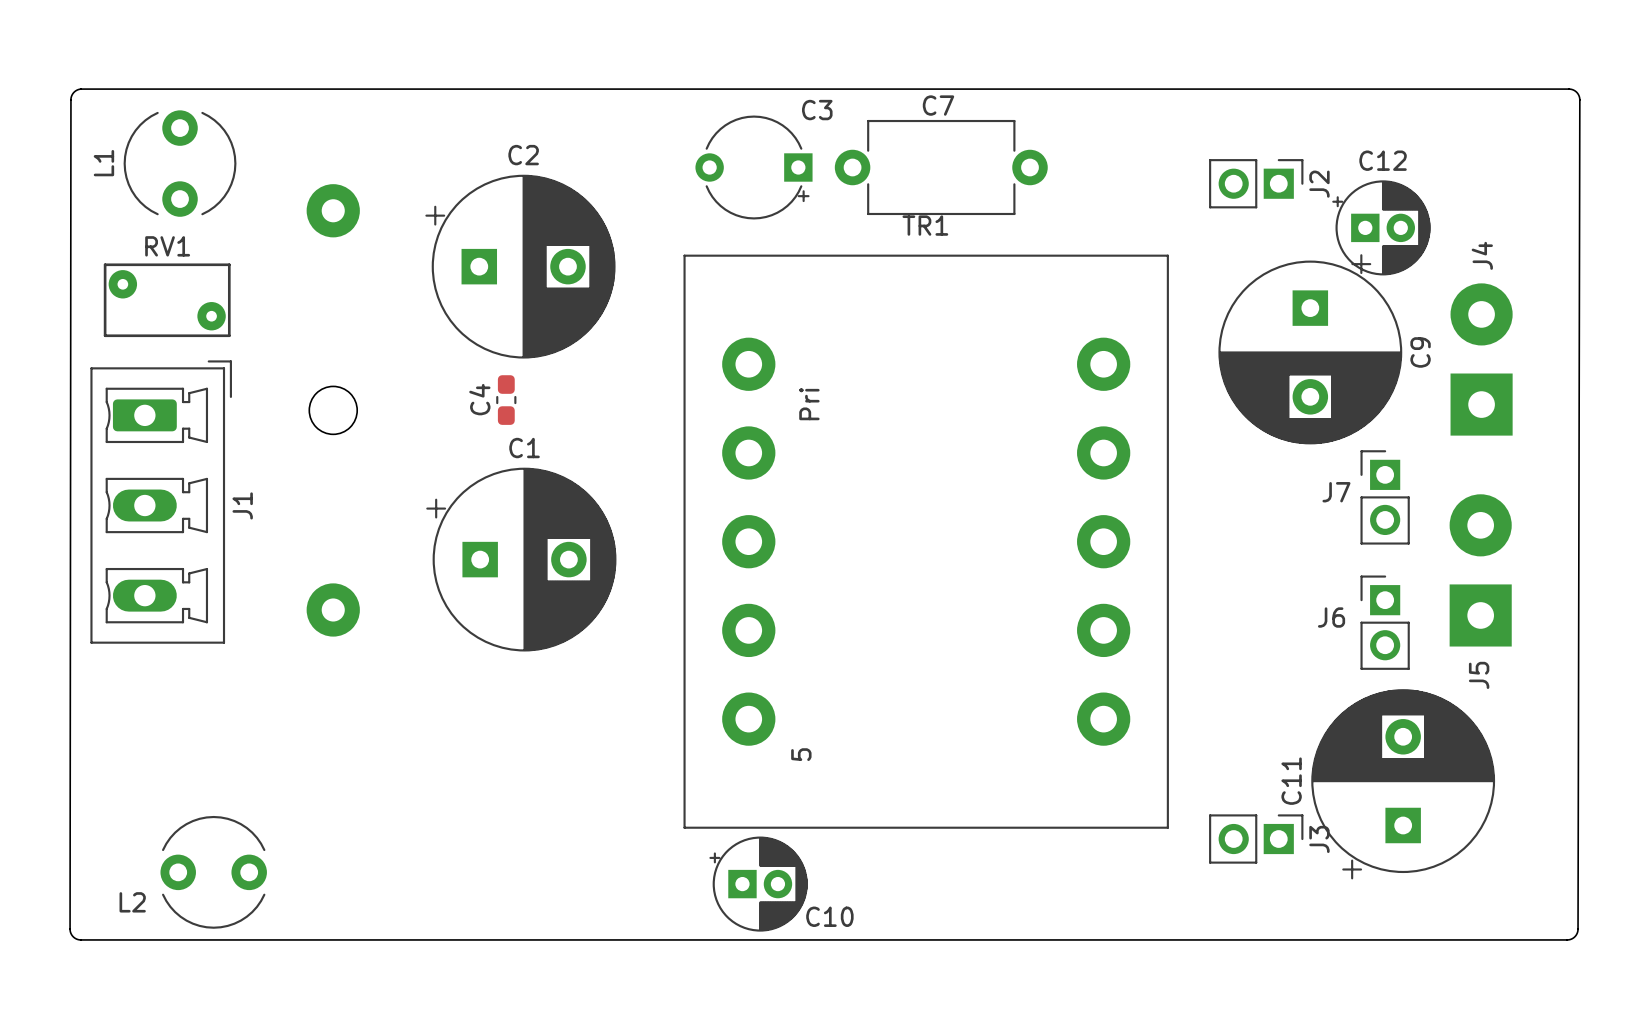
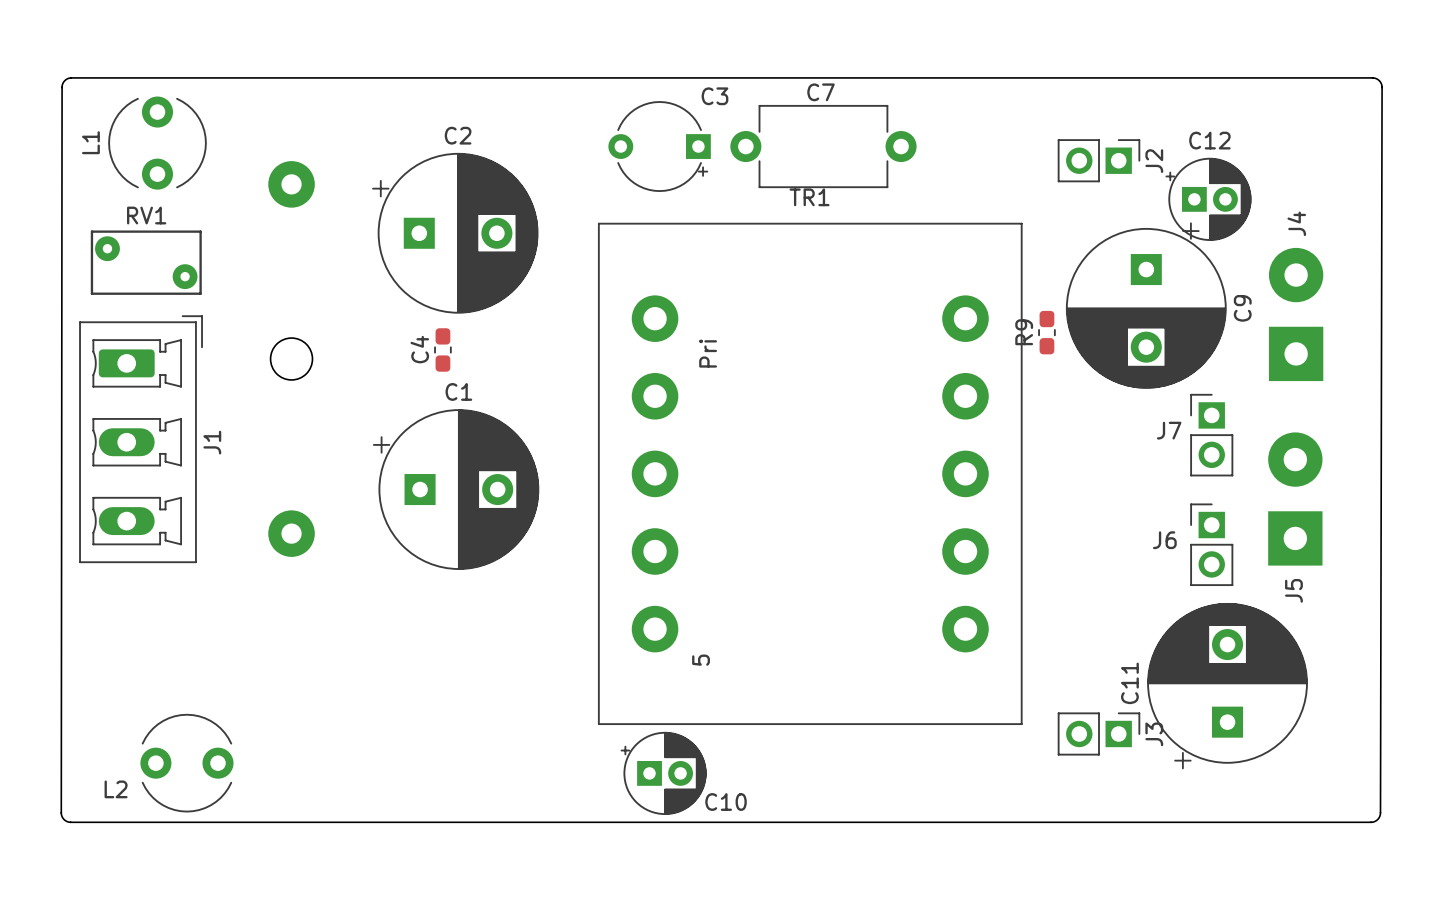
R9: none -> (1046, 332)

